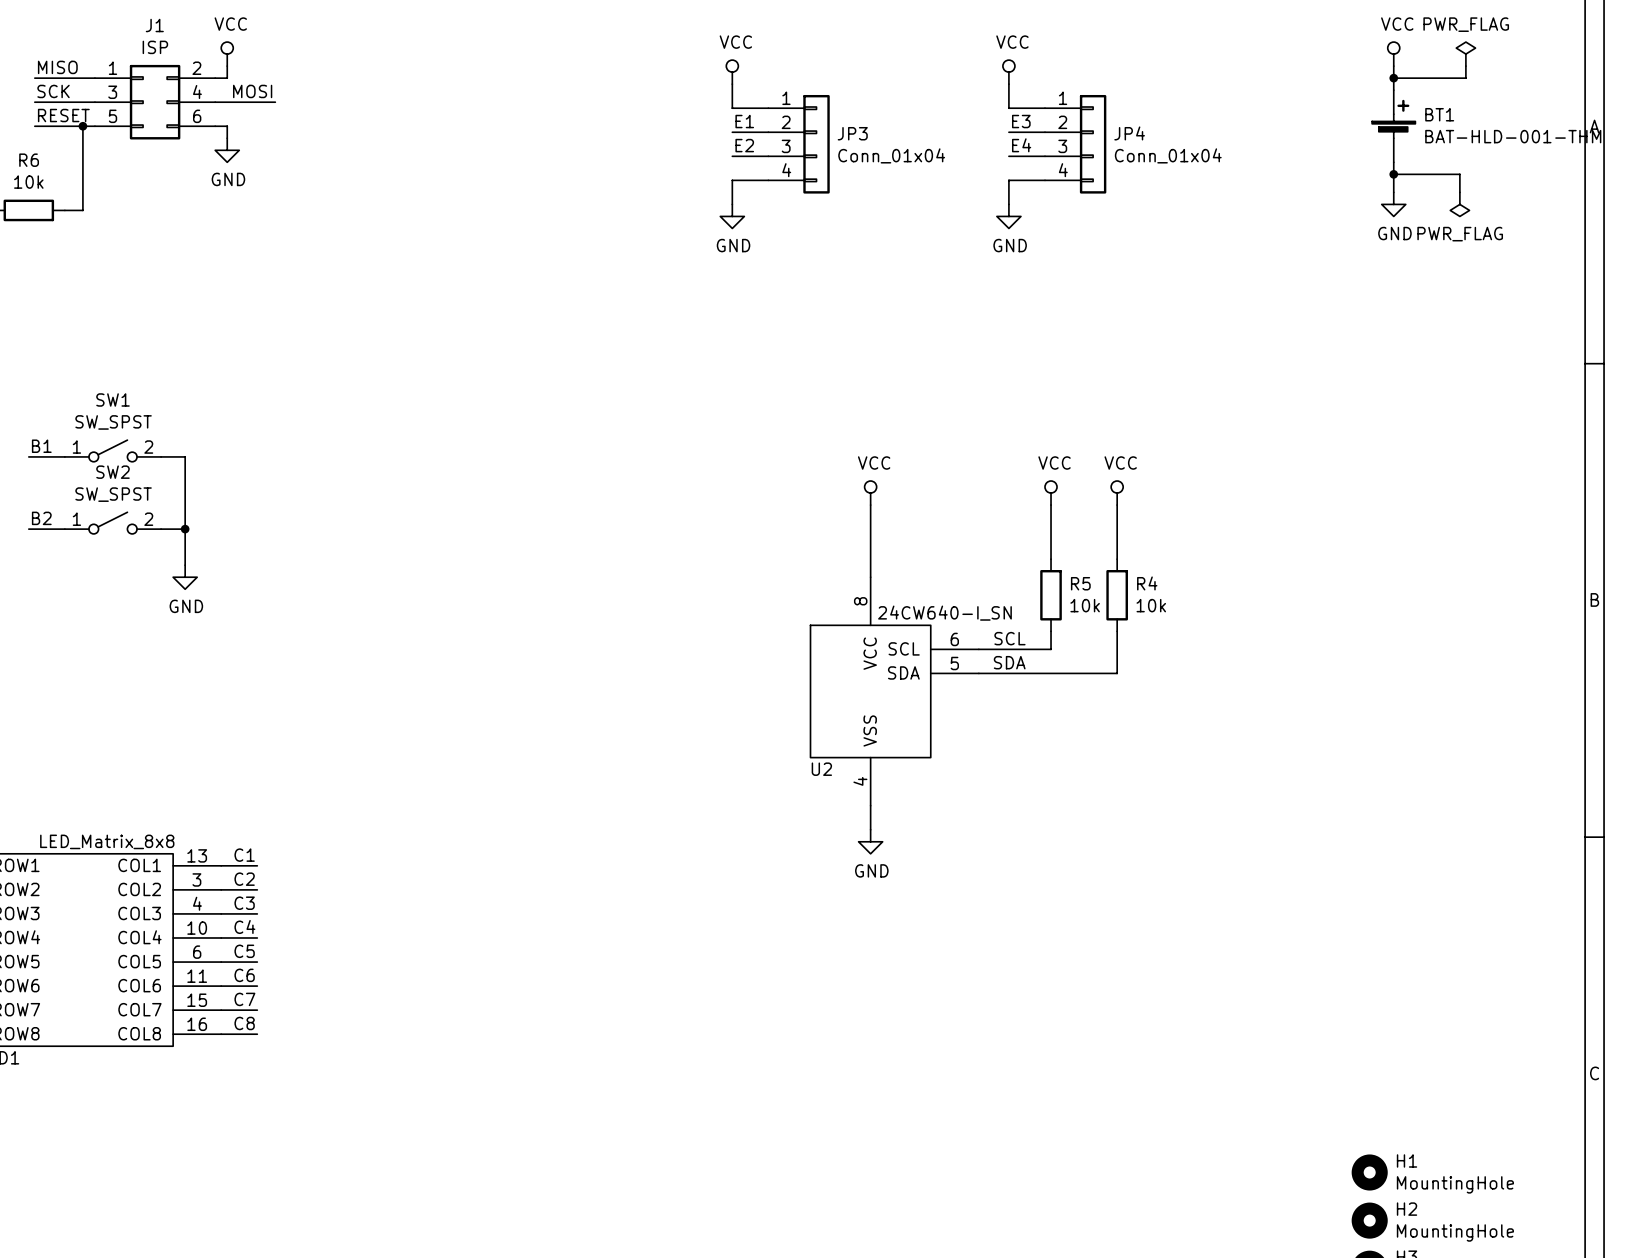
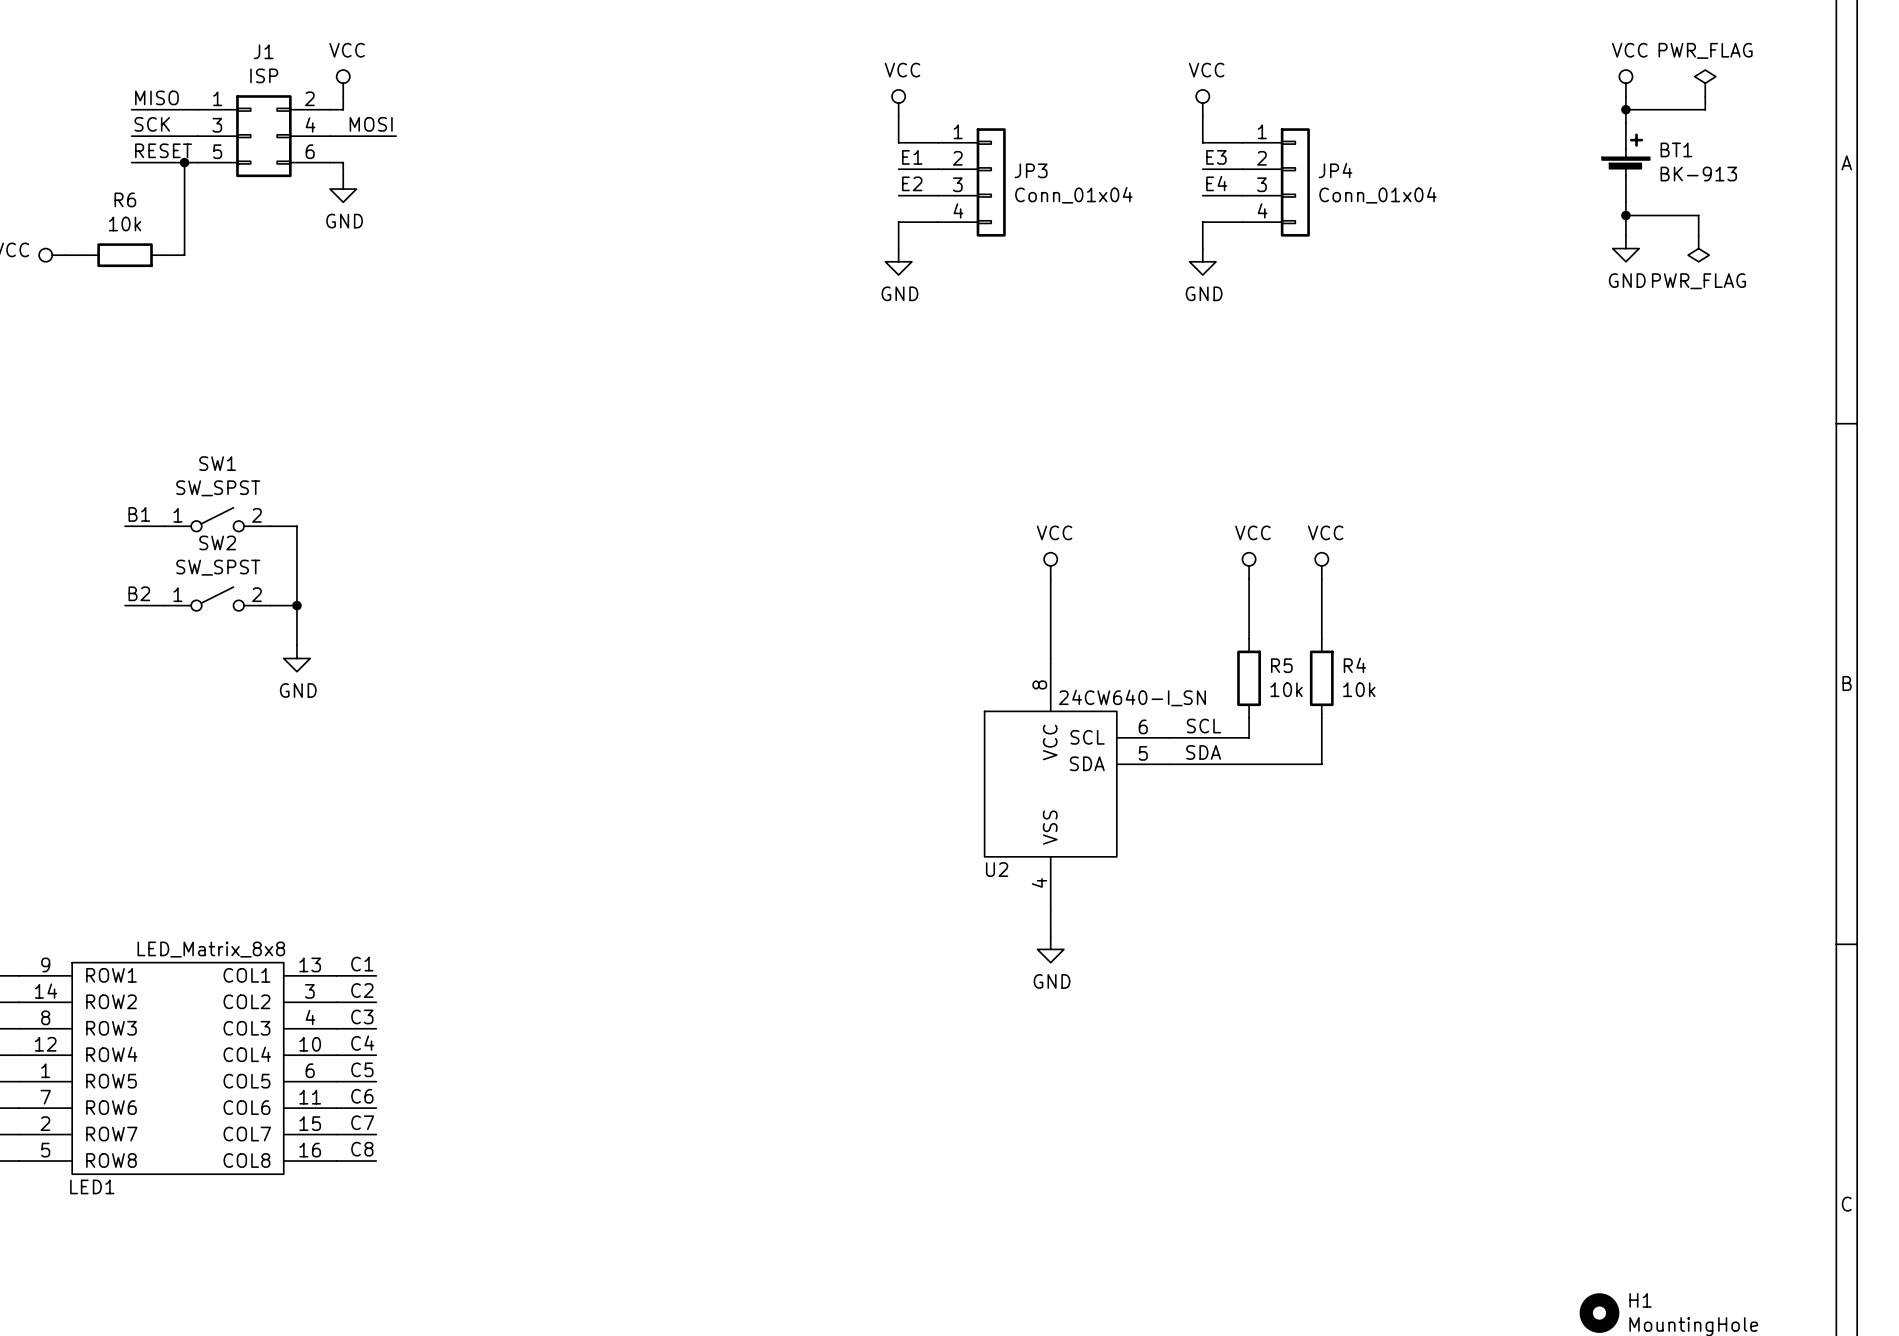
BT1 value: BAT-HLD-001-THM (1513, 136) -> BK-913 (1698, 174)

